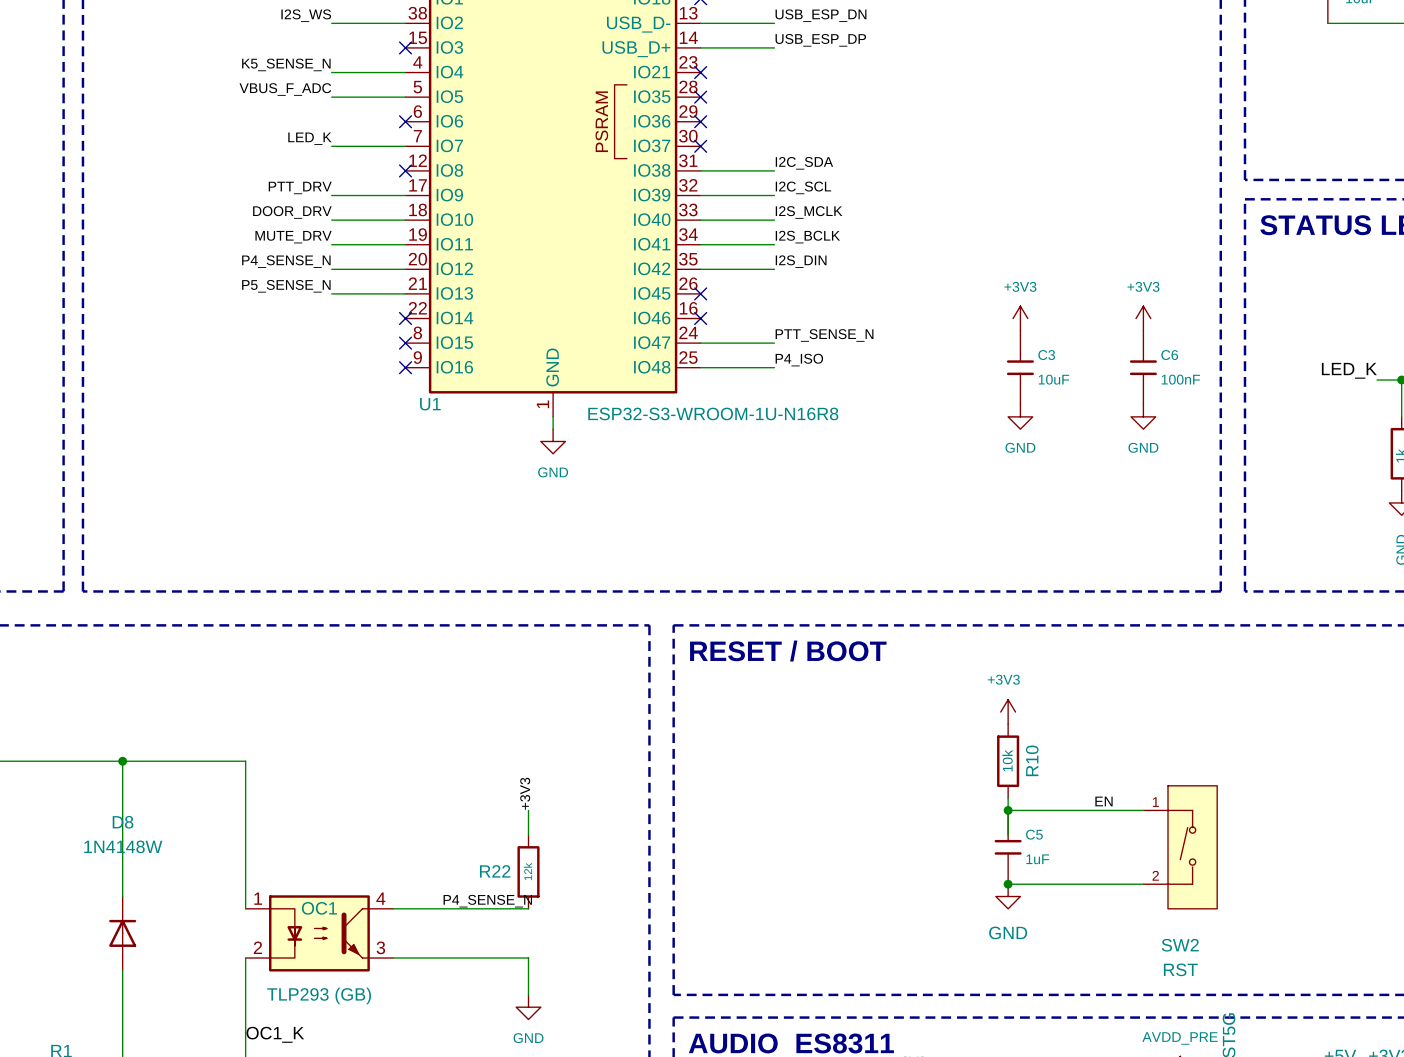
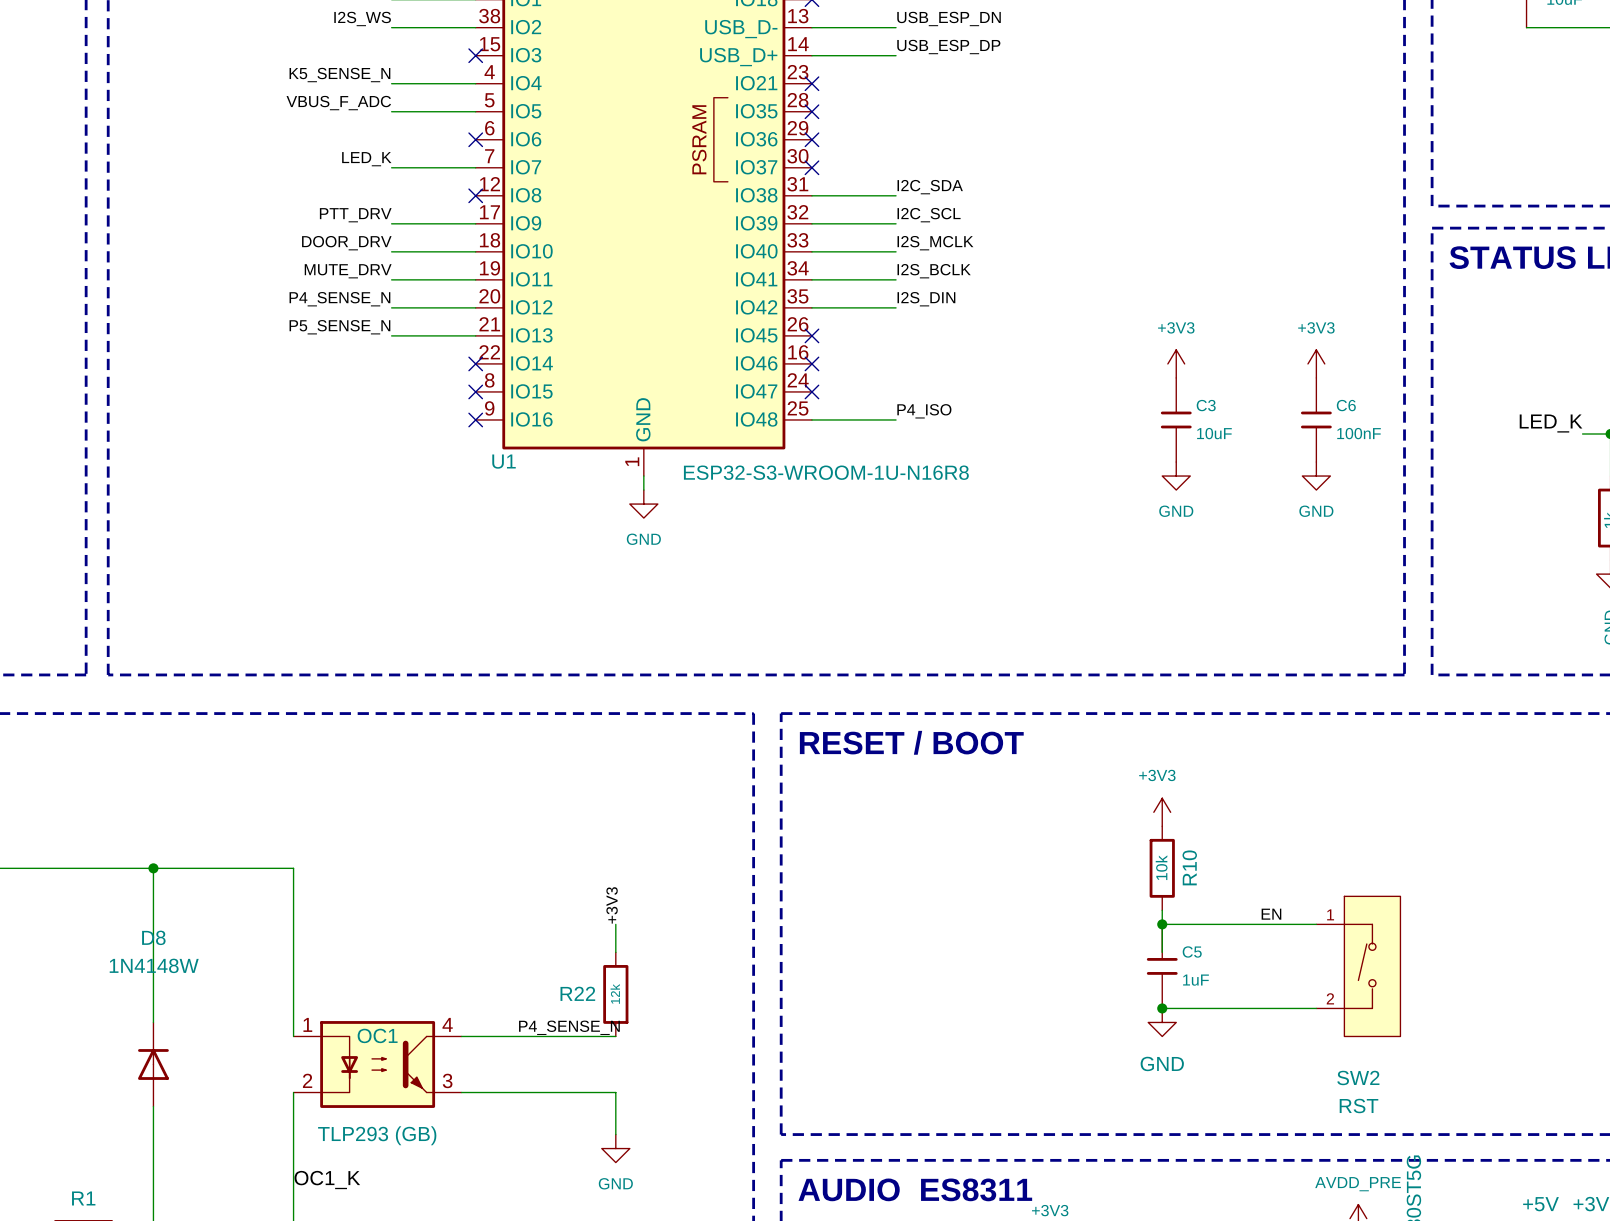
label: PTT_SENSE_N (824, 335) -> none
wire: (700, 343) (774, 343) -> none
no-connect mark: none -> (811, 391)

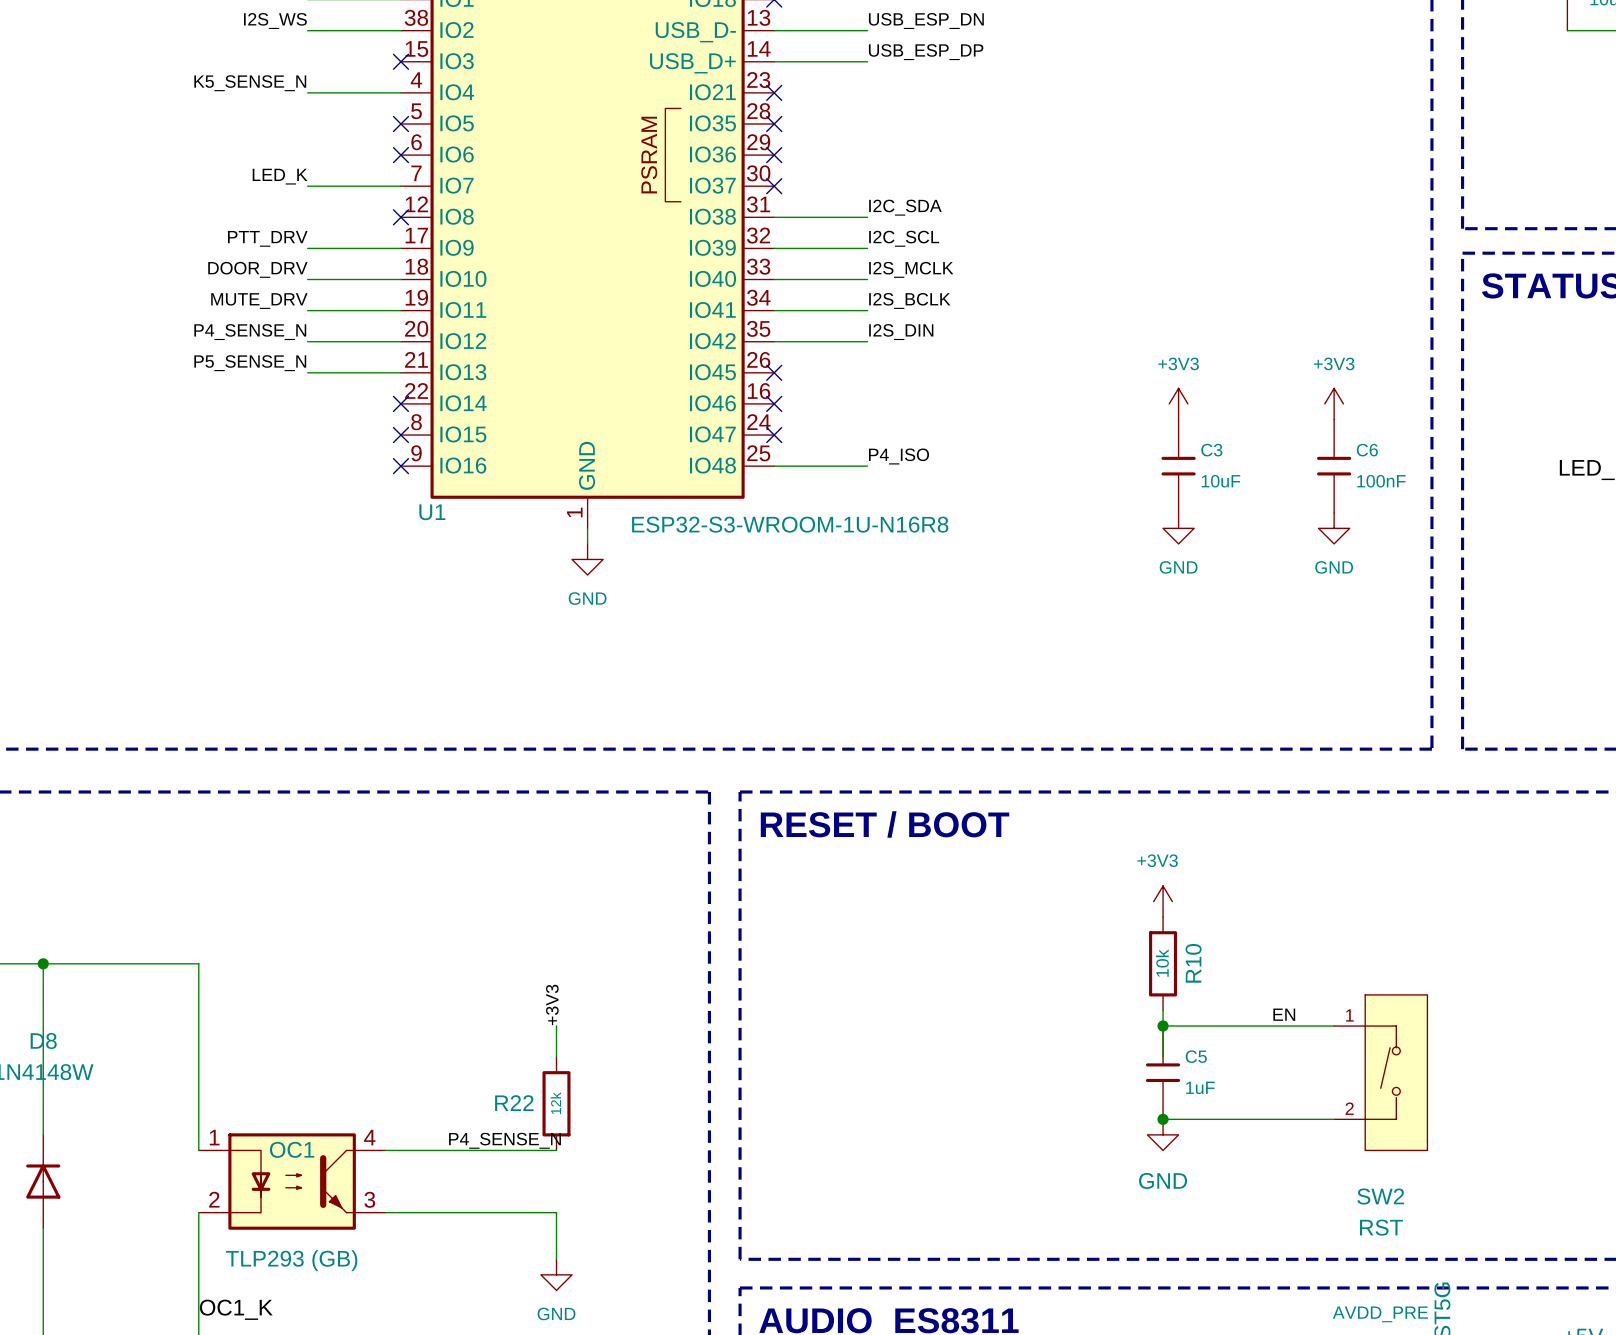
label: VBUS_F_ADC (338, 103) -> none
wire: (391, 111) (475, 111) -> none
no-connect mark: none -> (400, 123)

